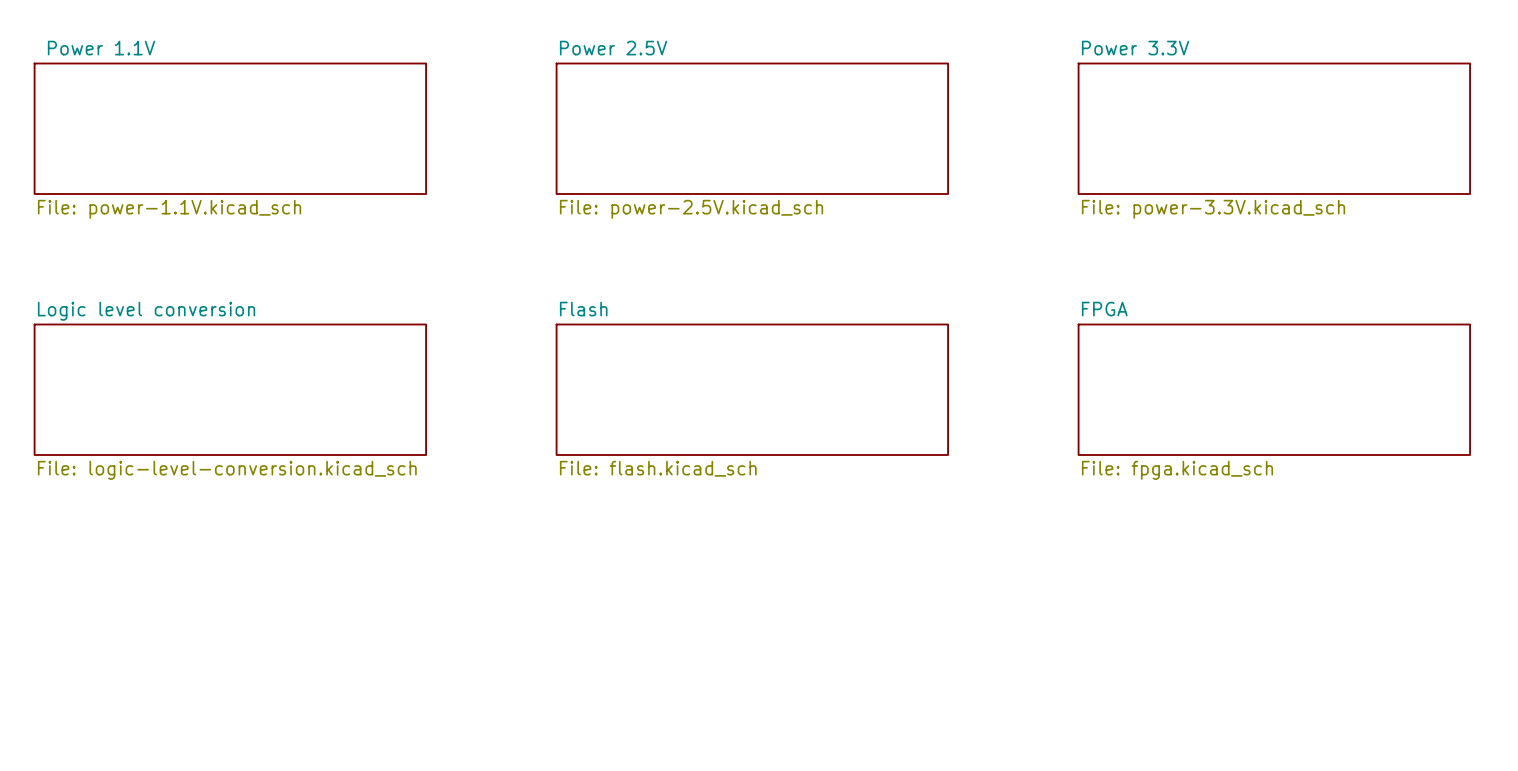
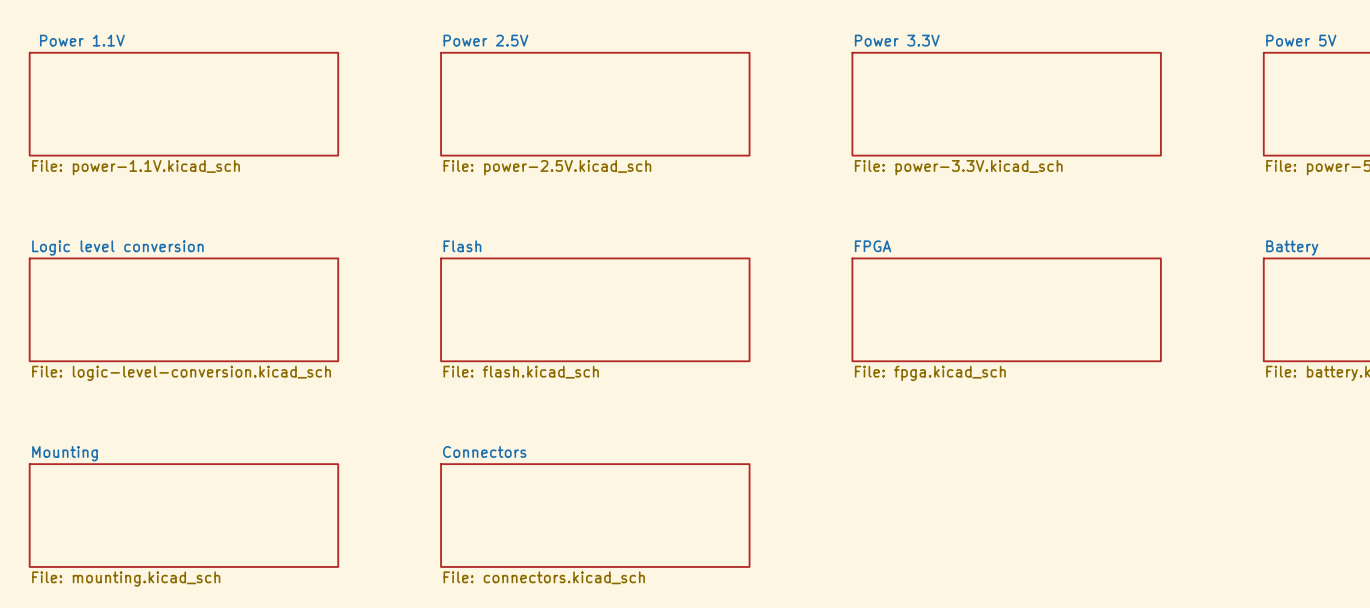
sheet Mounting: none -> File: mounting.kicad_sch (183, 515)
sheet Connectors: none -> File: connectors.kicad_sch (595, 515)

